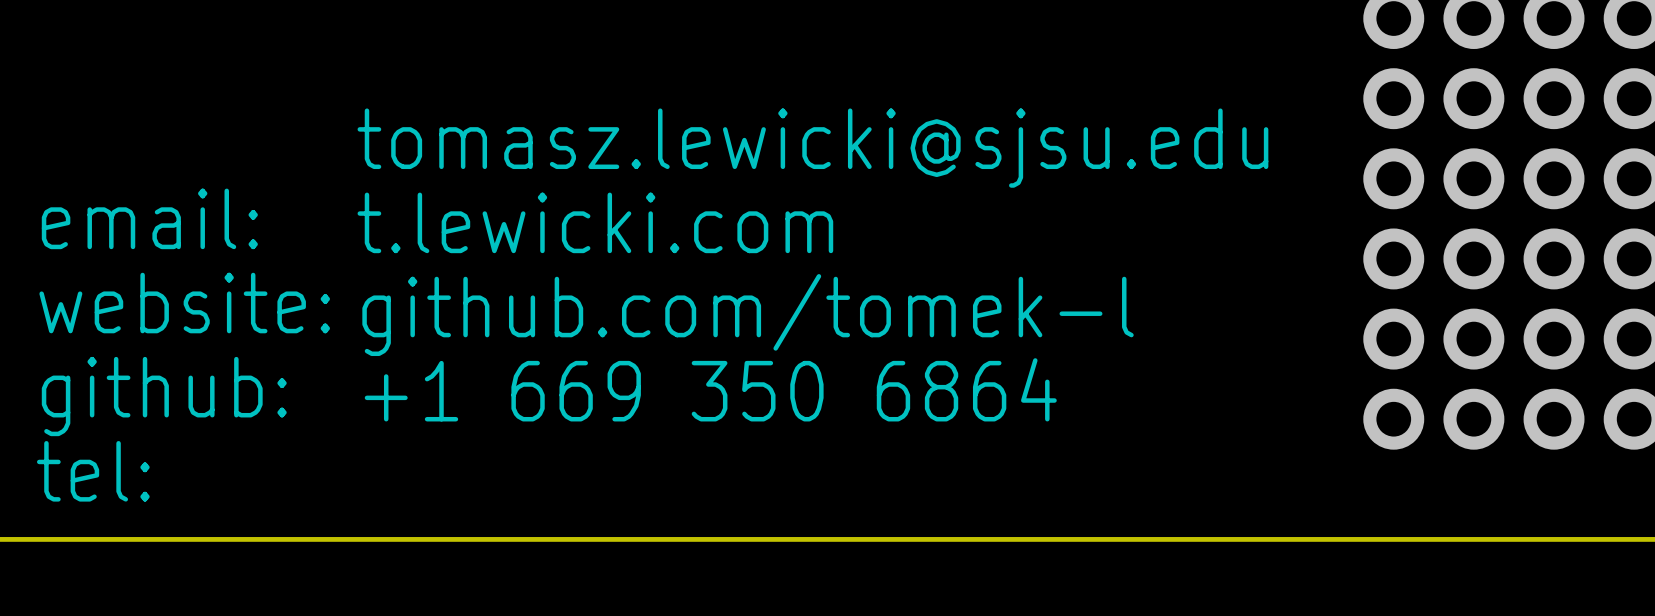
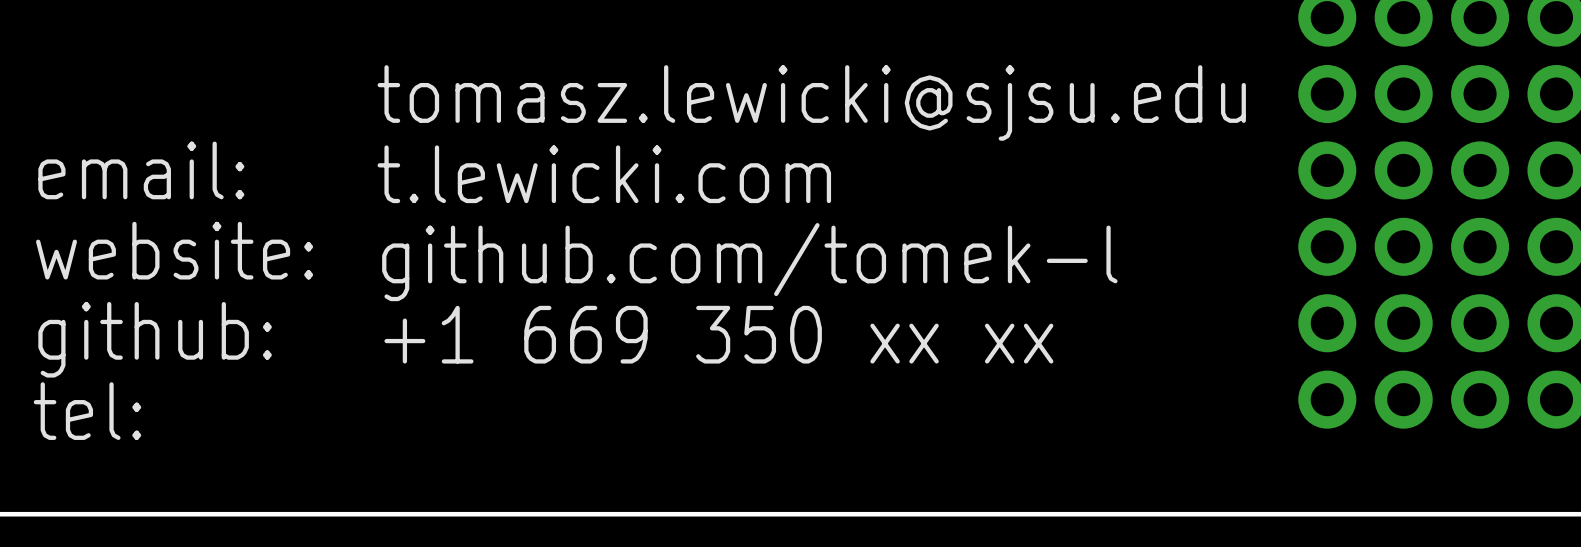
text position: tomasz.lewicki@sjsu.edu (812, 148) -> tomasz.lewicki@sjsu.edu (811, 102)
text position: email: (149, 218) -> email: (141, 170)
text position: t.lewicki.com (595, 222) -> t.lewicki.com (604, 174)
text position: website: (184, 303) -> website: (174, 250)
text position: github.com/tomek-l (748, 315) -> github.com/tomek-l (749, 262)
text: +1 669 350 6864 (710, 389) -> +1 669 350 xx xx (718, 334)
text position: github: (164, 396) -> github: (155, 339)
text position: tel: (93, 471) -> tel: (87, 411)

